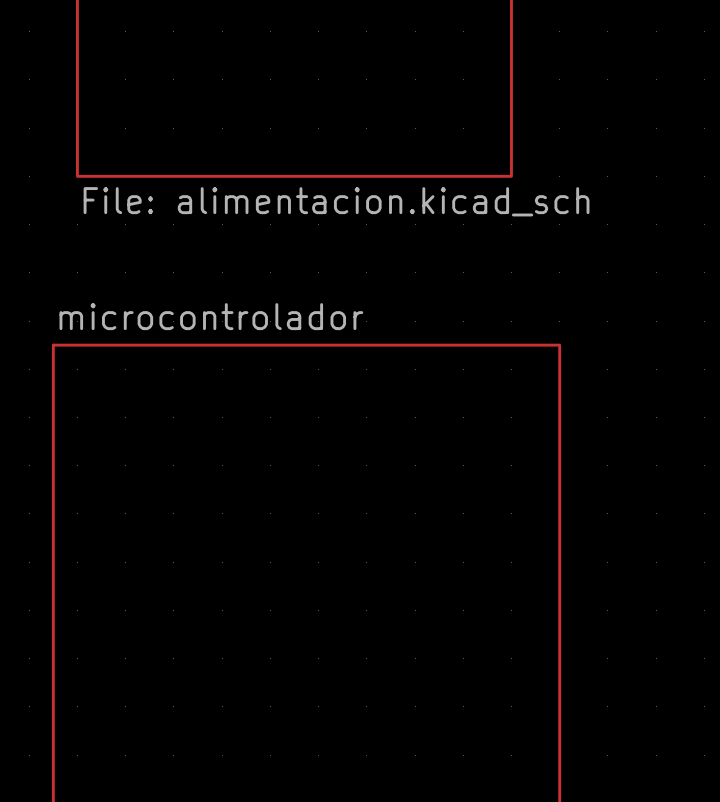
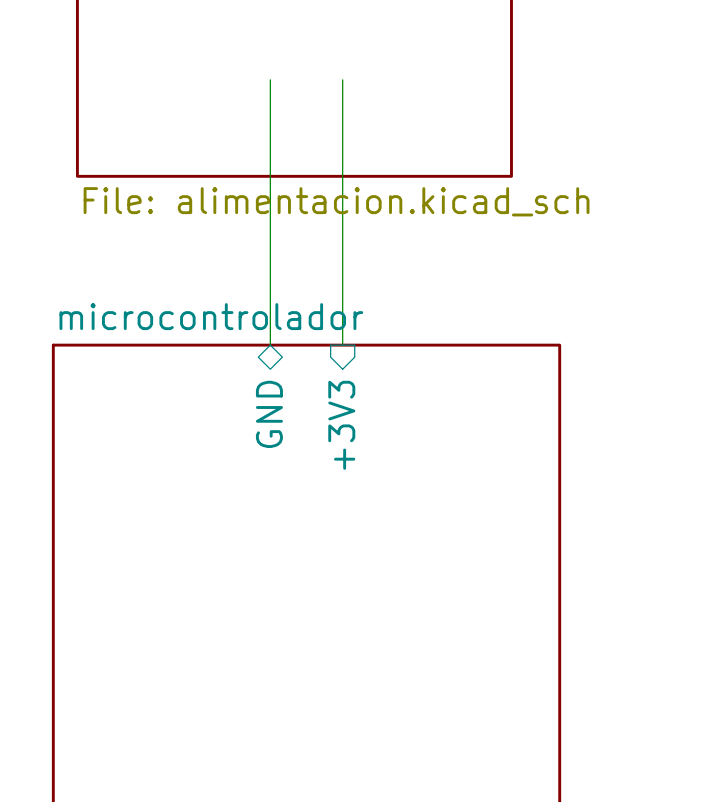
wire: none -> (270, 79) (270, 345)
wire: none -> (342, 79) (342, 345)
sheet pin: none -> GND (269, 414)
sheet pin: none -> +3V3 (341, 425)

